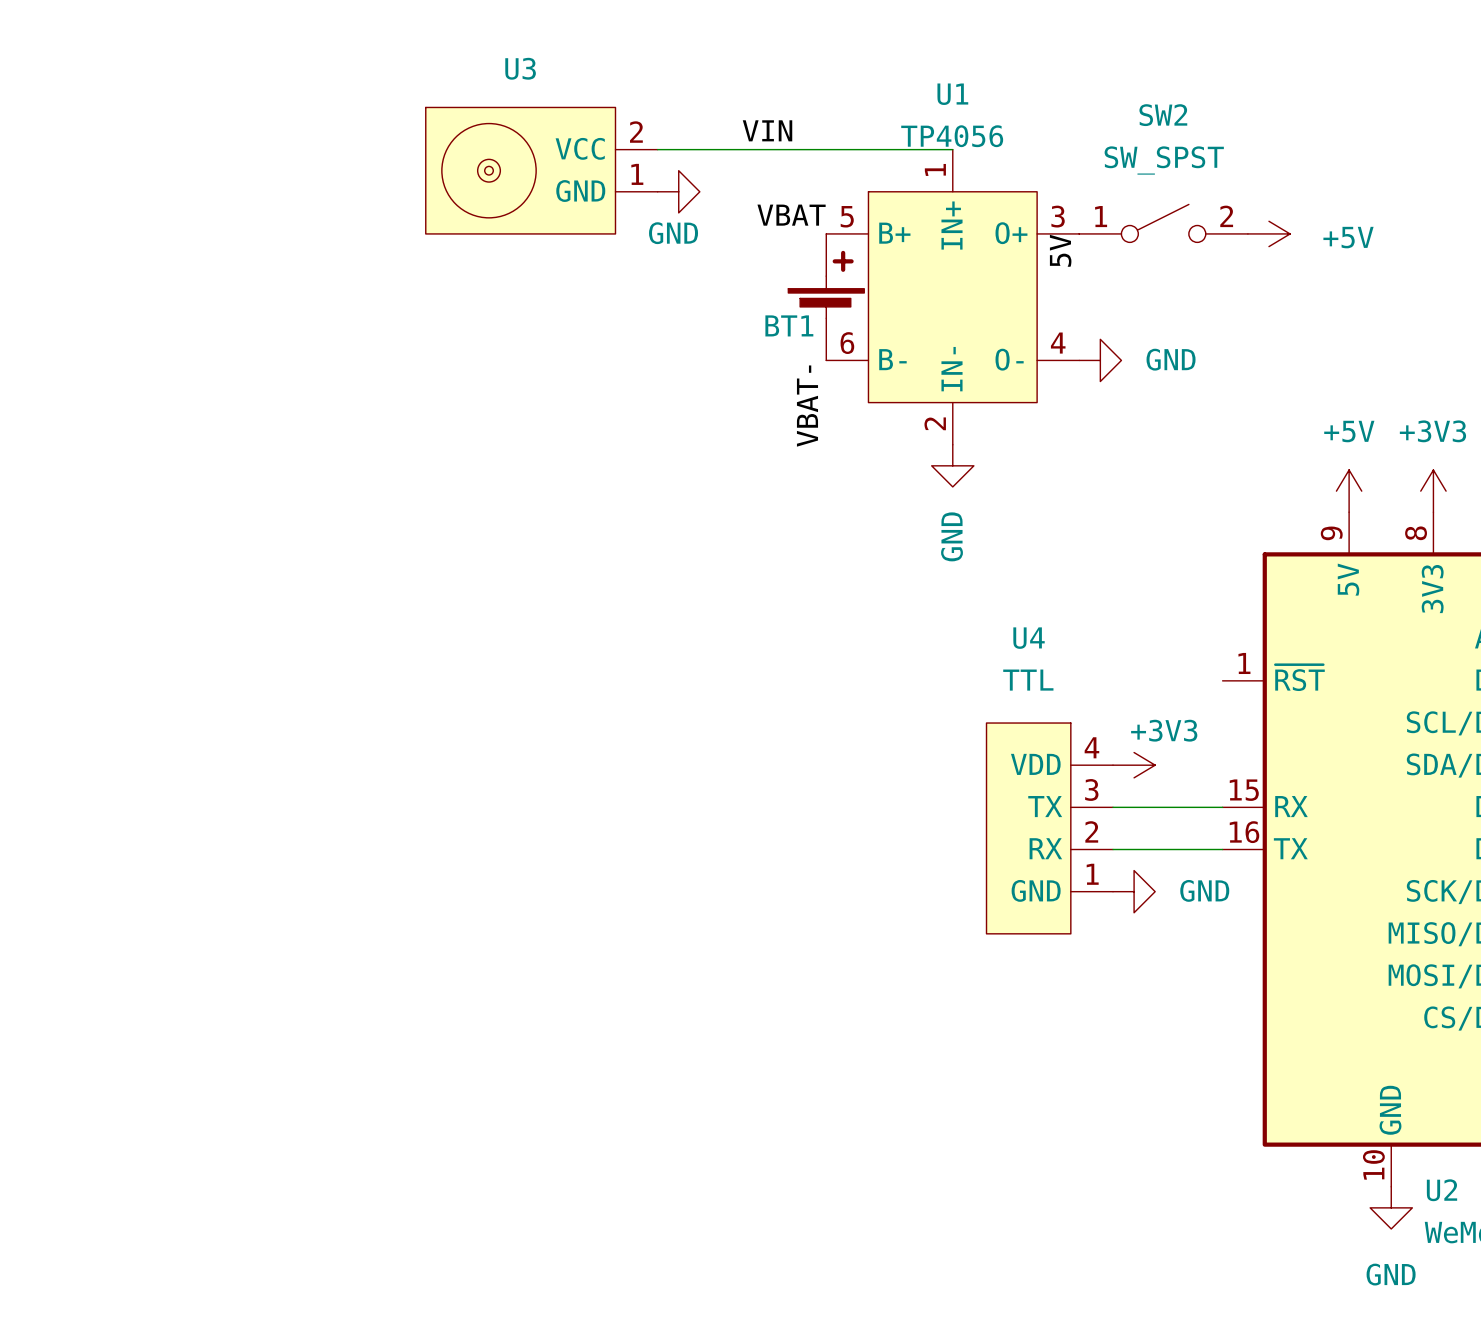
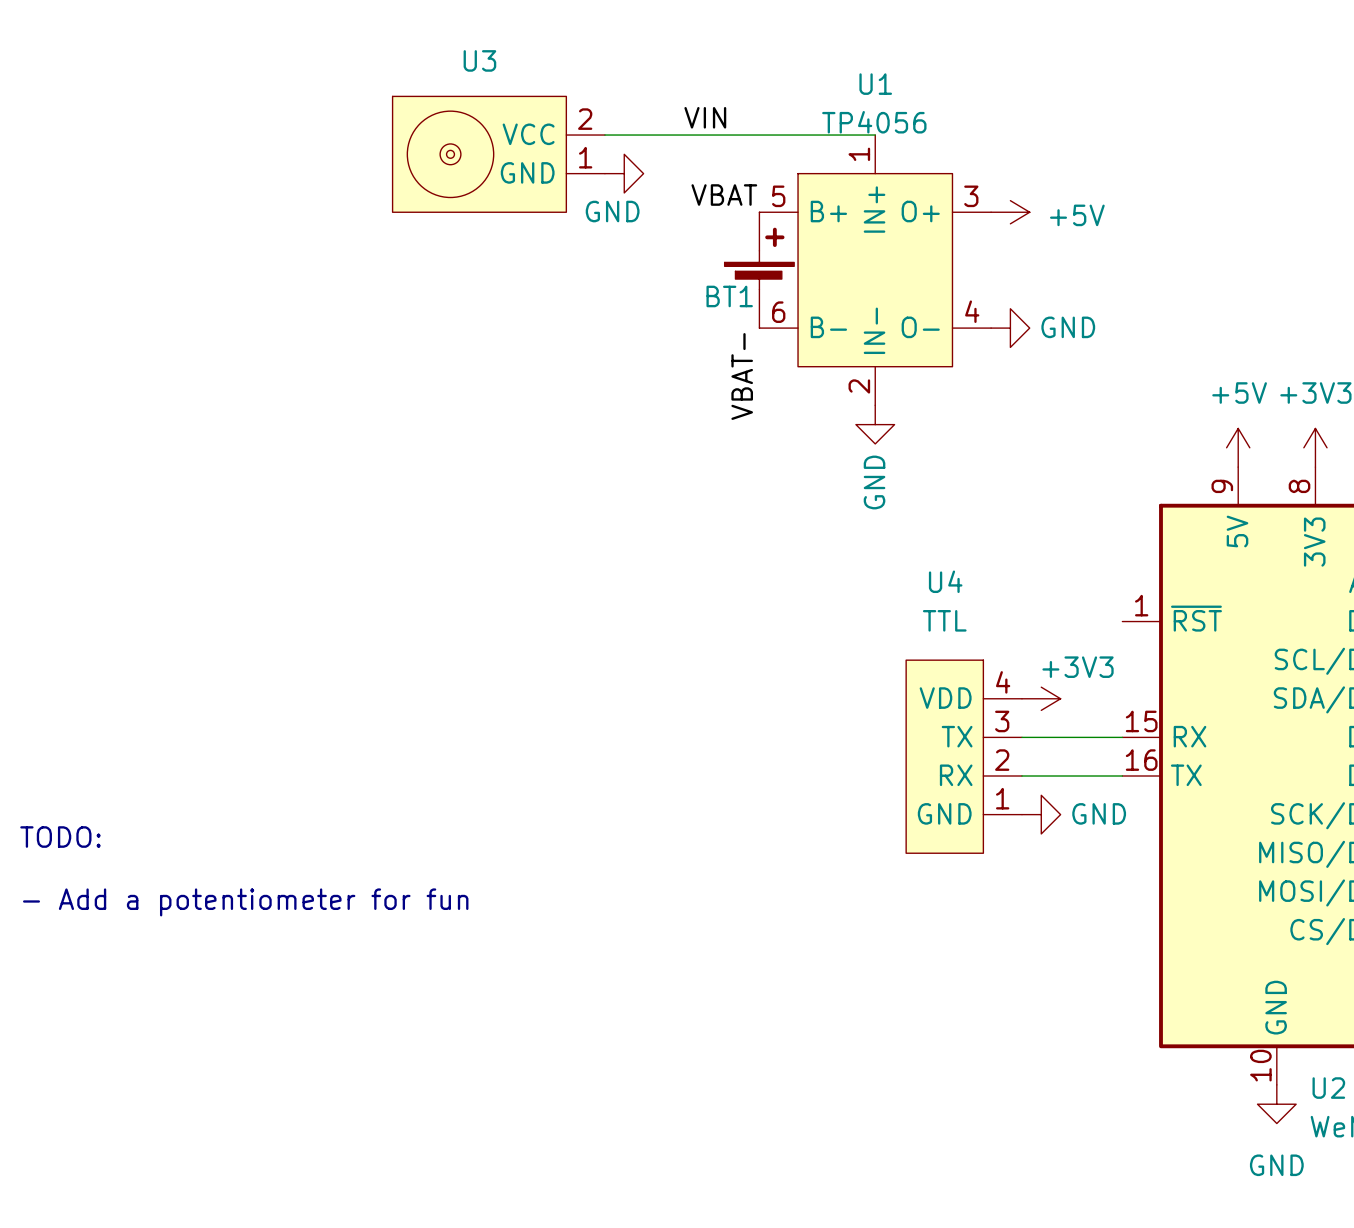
SW2: SW_SPST (1163, 223) -> none
power symbol position: +5V (1268, 233) -> +5V (1010, 212)
label: 5V (1060, 250) -> none
text: none -> TODO: (60, 837)
text: none -> - Add a potentiometer for fun (245, 902)

